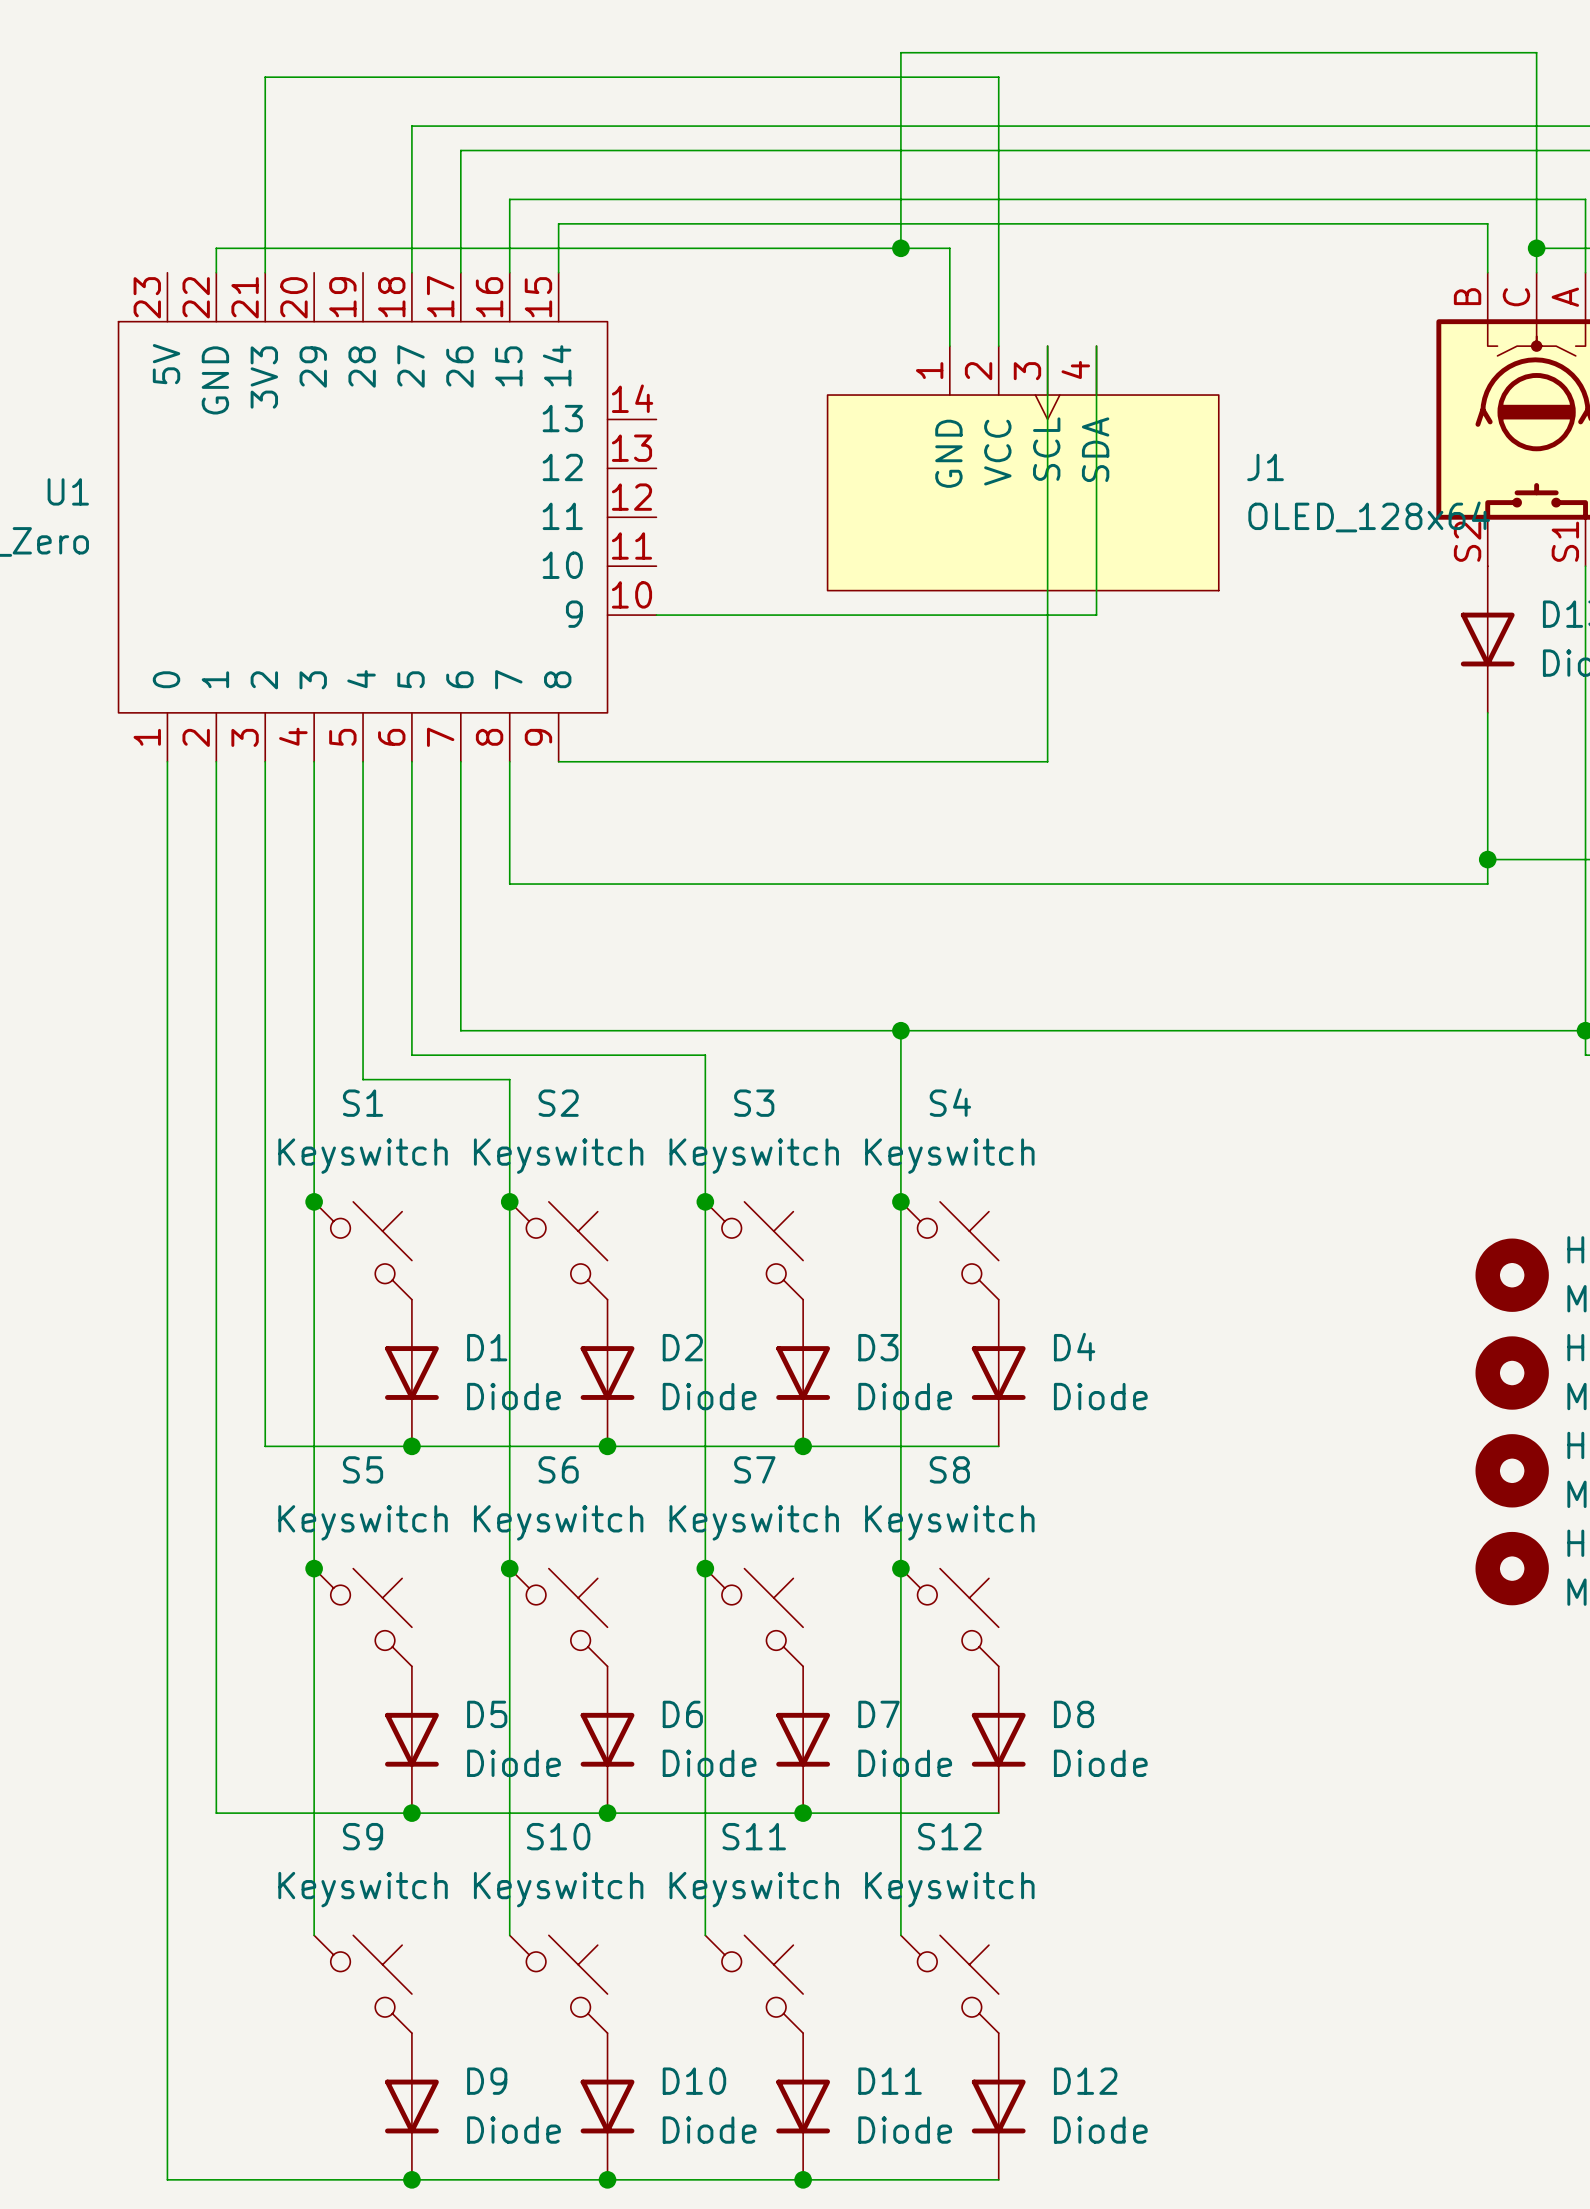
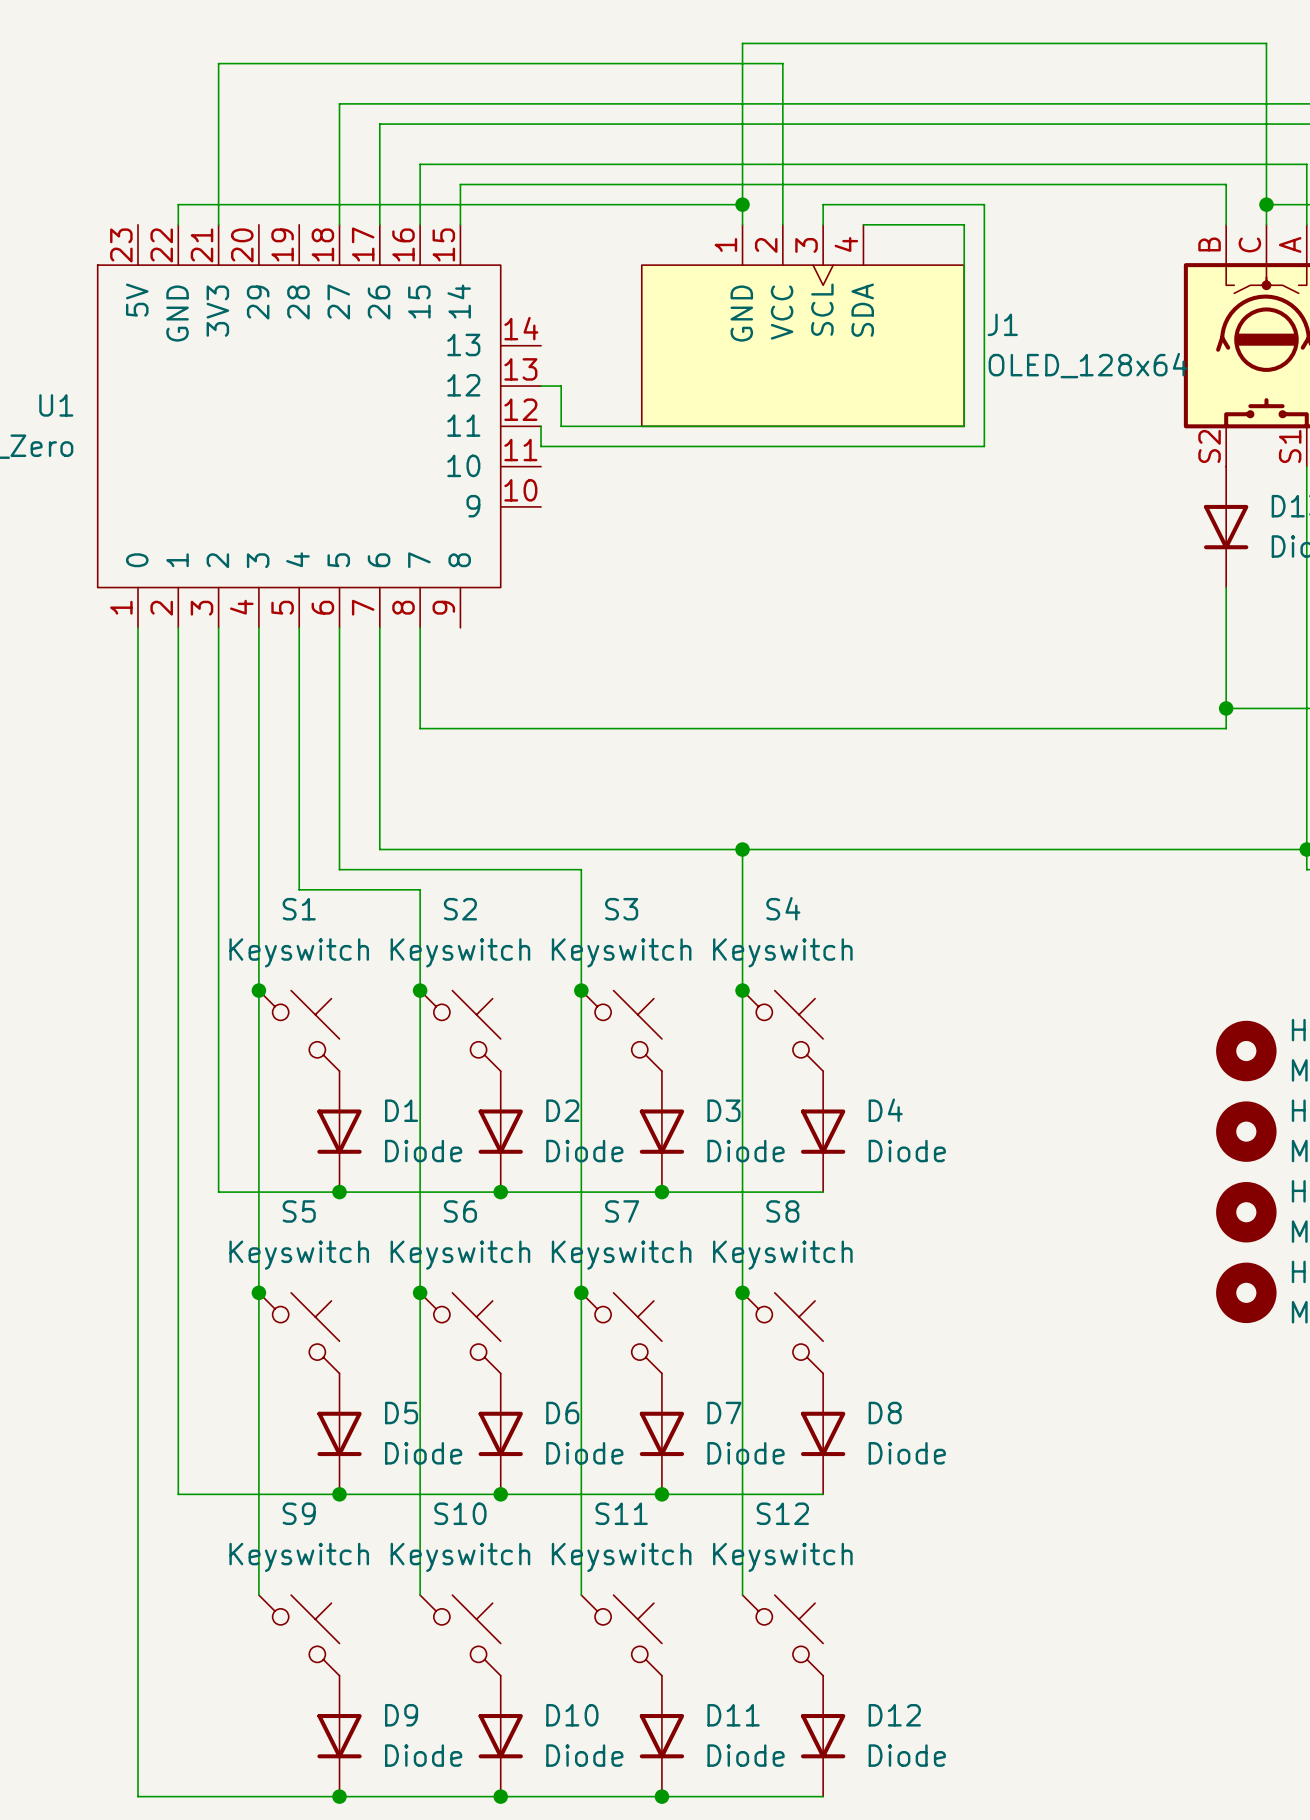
wire: (949, 77) (998, 77) (998, 248) -> (782, 63) (782, 204)
wire: (900, 248) (949, 248) -> (742, 204) (742, 224)
wire: none -> (823, 204) (984, 204) (984, 446) (541, 446) (541, 426)
wire: none -> (863, 224) (964, 224) (964, 426) (561, 426) (561, 386) (541, 386)
wire: (1047, 346) (1047, 761) (558, 761) -> none
wire: (1096, 346) (1096, 615) (656, 615) -> none
J1 position: (1023, 468) -> (802, 325)

